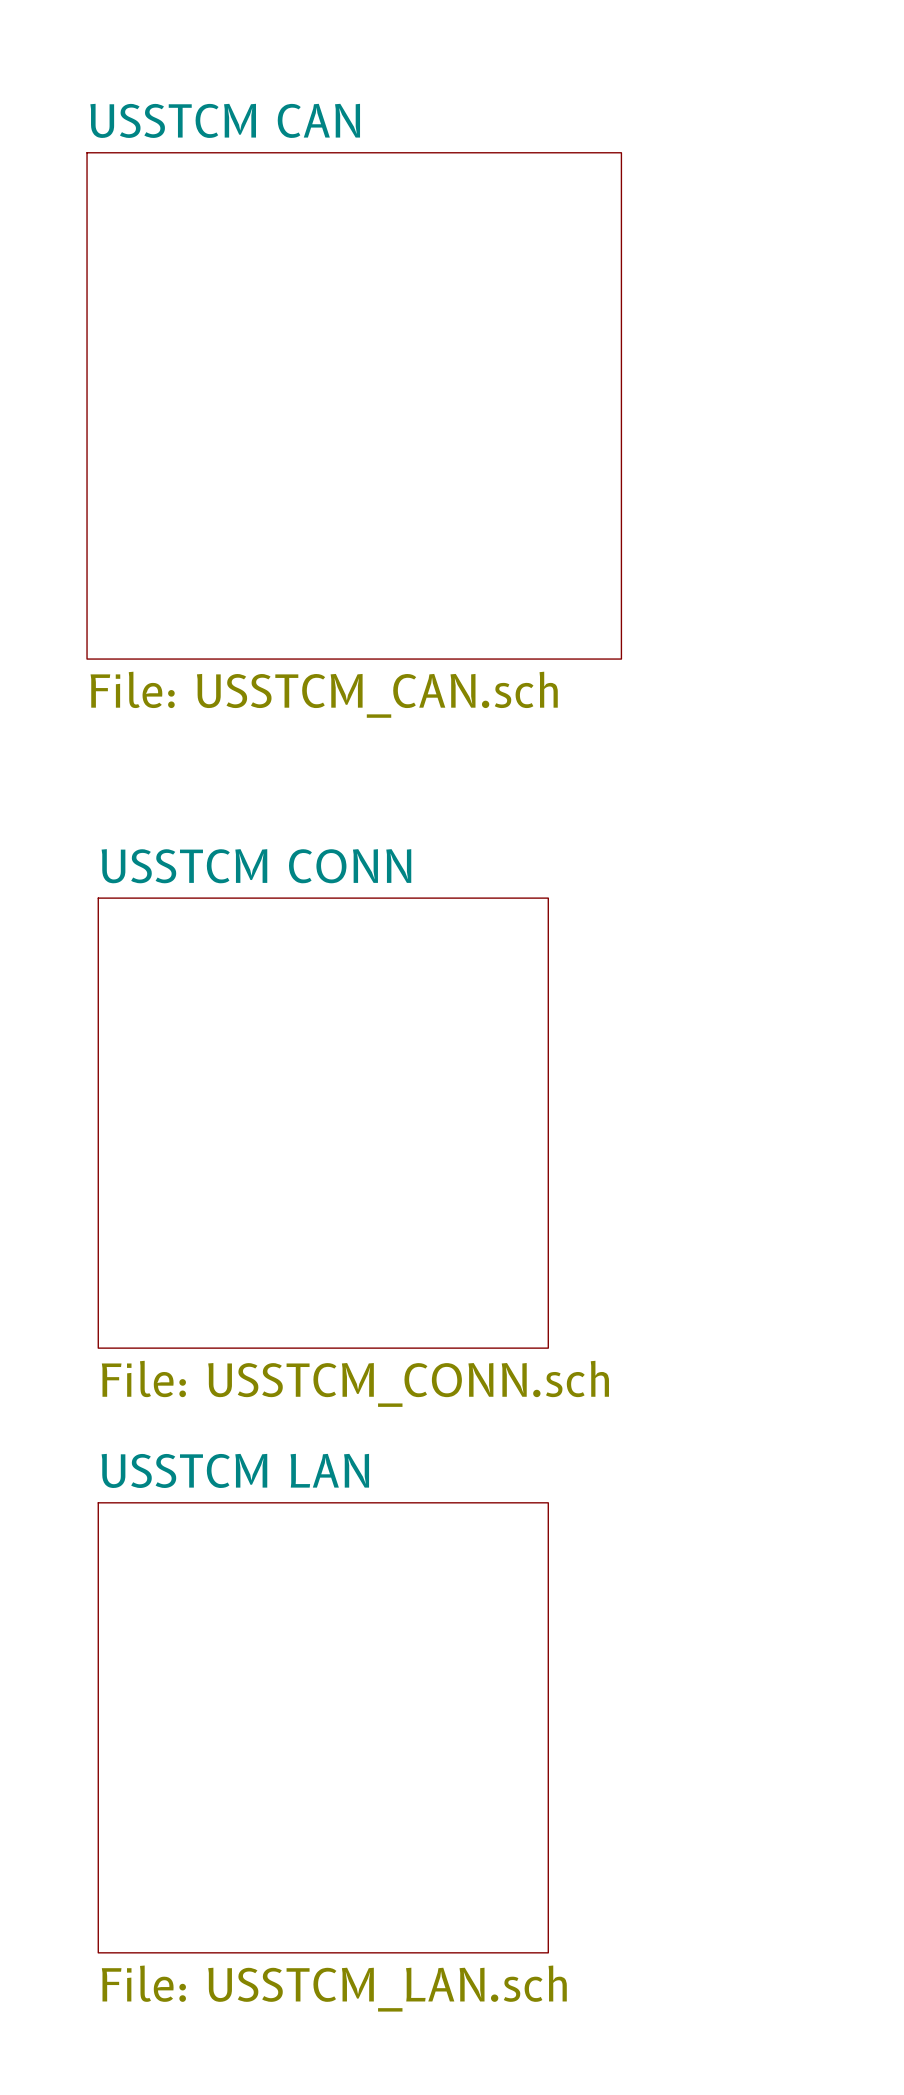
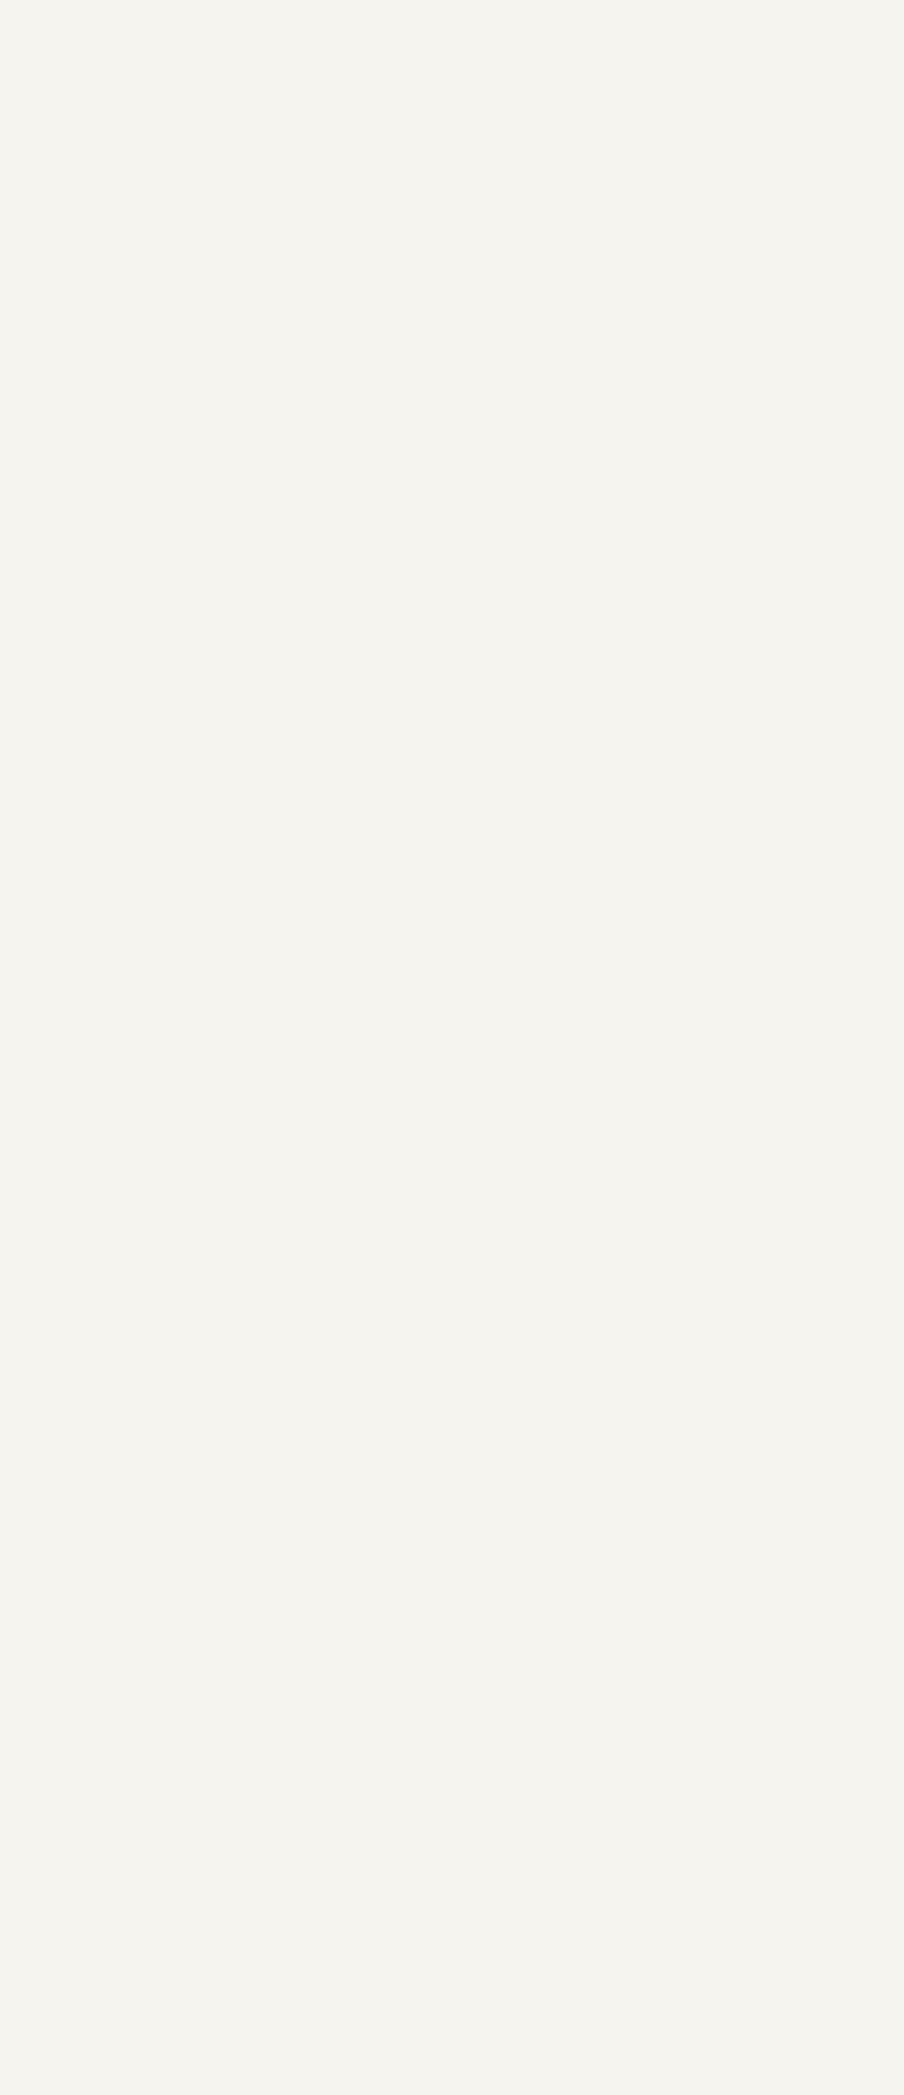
sheet USSTCM CAN: File: USSTCM_CAN.sch (354, 405) -> none
sheet USSTCM CONN: File: USSTCM_CONN.sch (323, 1123) -> none
sheet USSTCM LAN: File: USSTCM_LAN.sch (323, 1727) -> none

